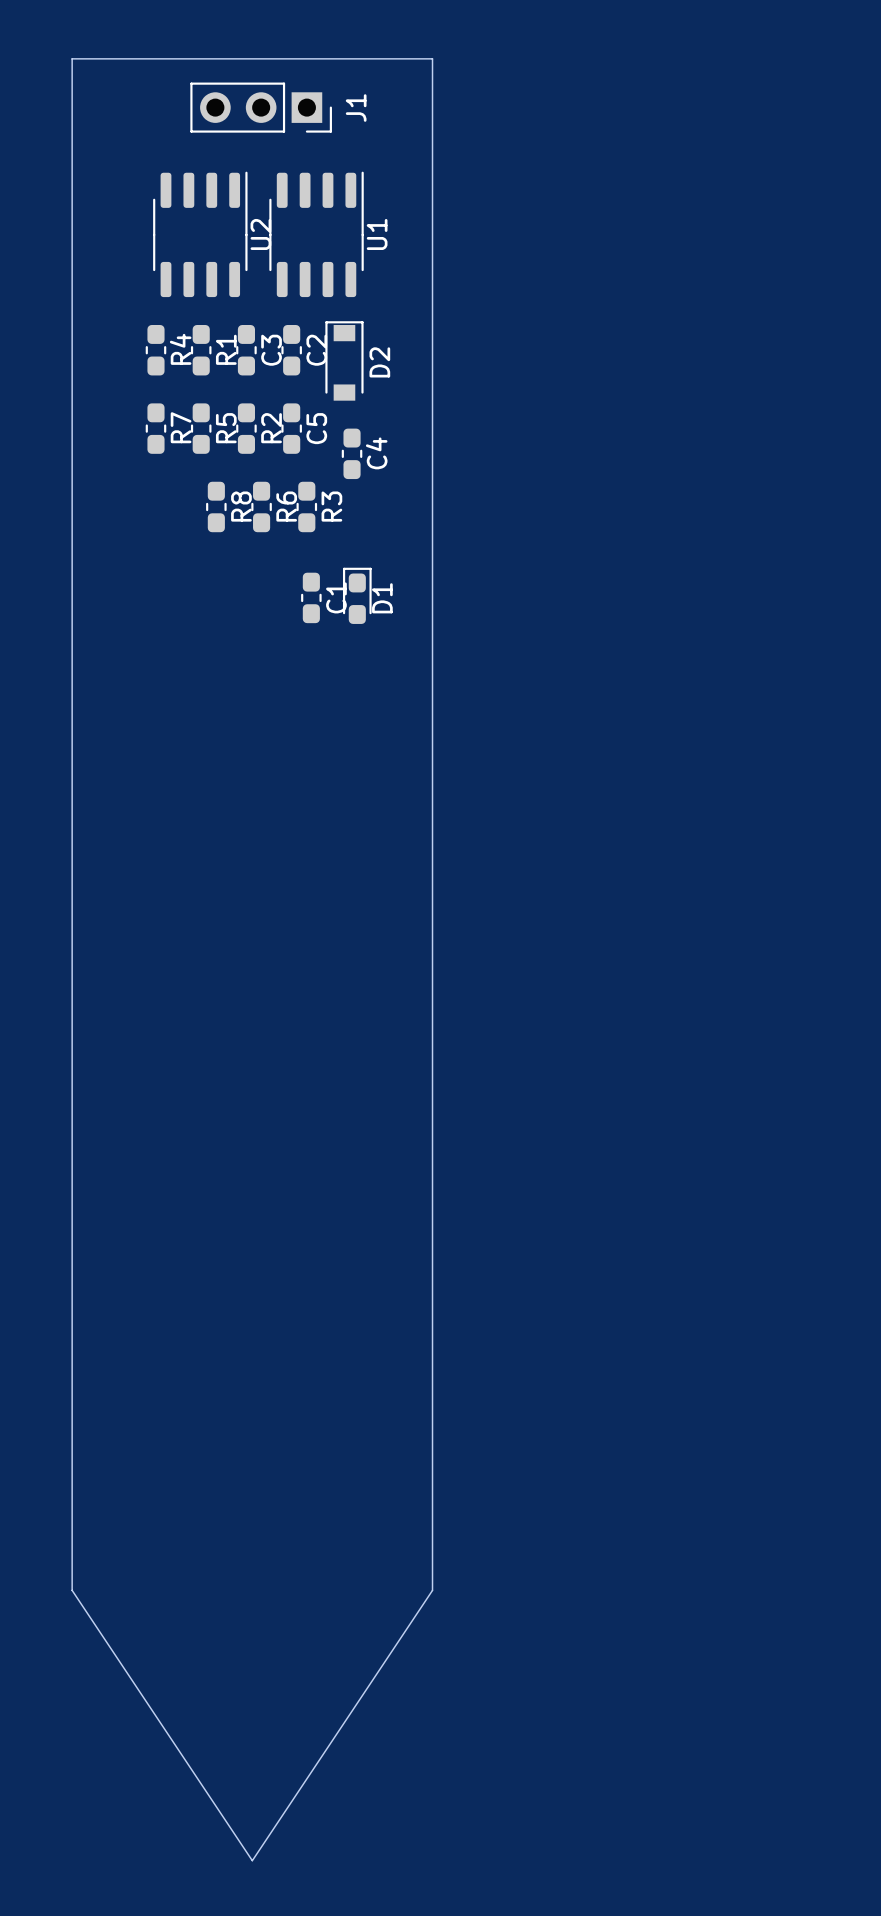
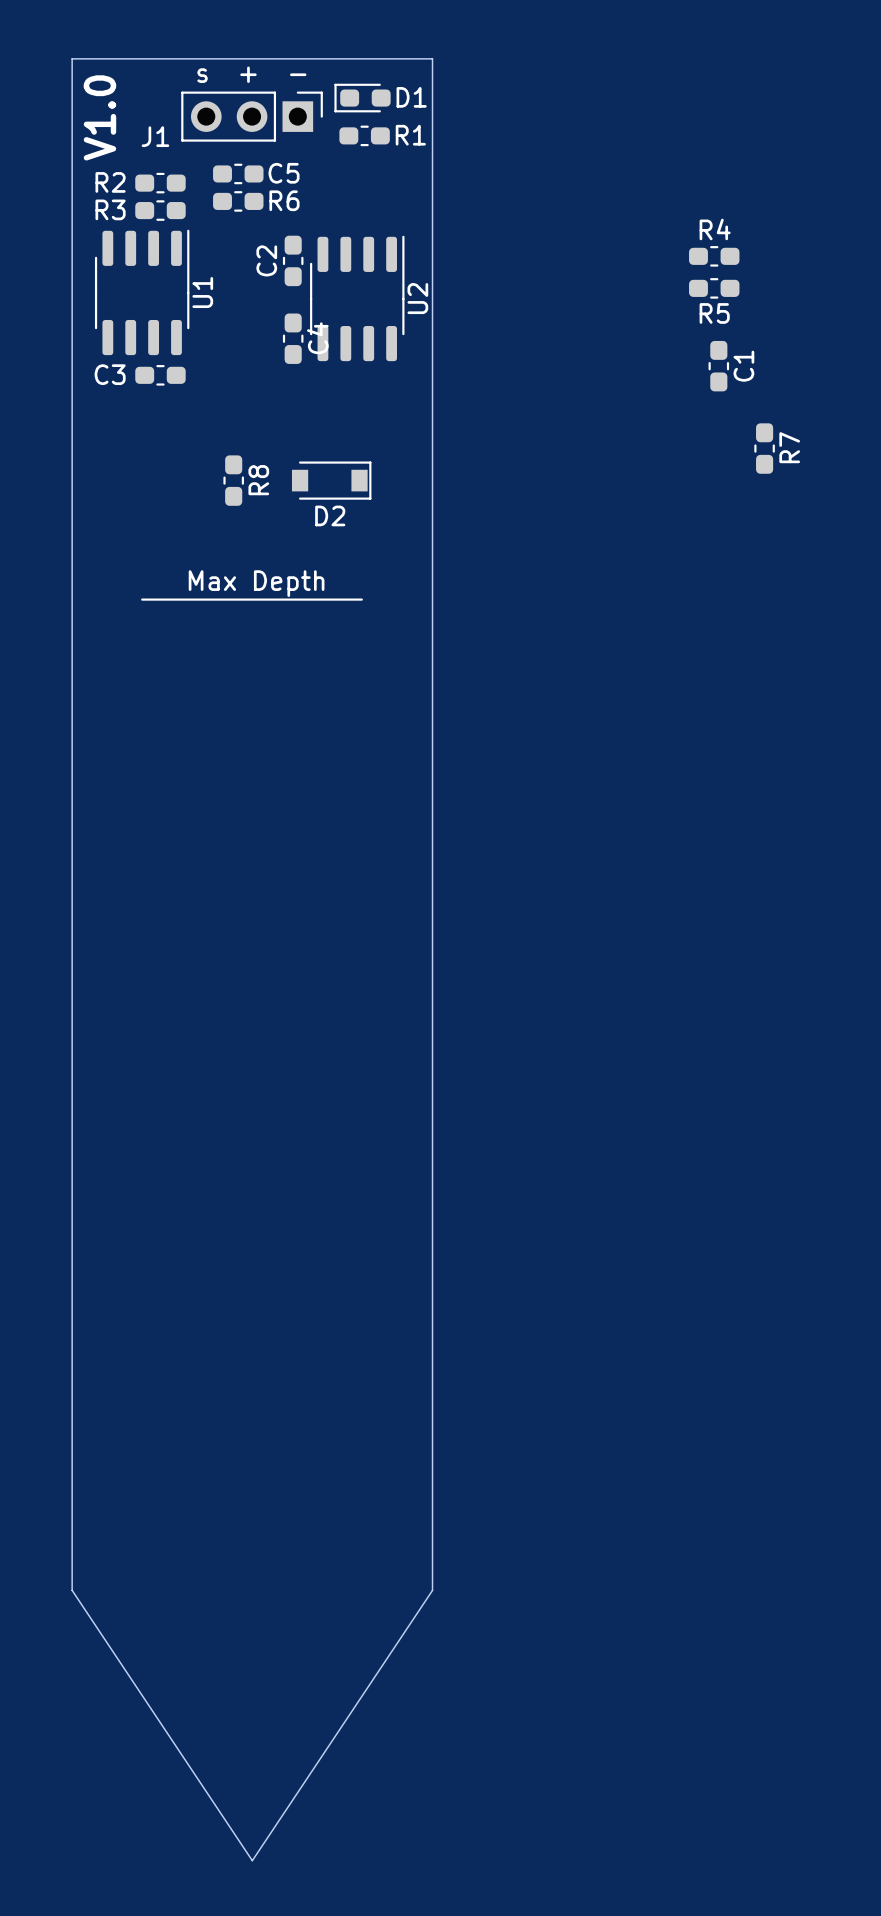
text: none -> s + - (251, 74)
J1 footprint: [190, 82, 332, 133] -> [181, 91, 323, 142]
J1 name position: J1 (356, 108) -> J1 (155, 136)
text: none -> V1.0 (99, 117)
U2 position: (200, 234) -> (357, 298)
U1 position: (316, 234) -> (142, 292)
R4 name position: R4 (180, 349) -> R4 (715, 229)
R4 rotation: 0° (155, 350) -> 90° clockwise (714, 256)
R4 position: (155, 350) -> (714, 256)
R1 rotation: 0° (201, 350) -> 90° clockwise (364, 135)
R1 position: (201, 350) -> (364, 135)
C3 rotation: 0° (246, 350) -> 90° clockwise (160, 375)
C3 position: (246, 350) -> (160, 375)
C3 name position: C3 (271, 350) -> C3 (110, 374)
C2 position: (291, 350) -> (293, 260)
C2 name position: C2 (316, 350) -> C2 (266, 260)
D2 rotation: 0° (344, 360) -> 90° clockwise (331, 480)
D2 position: (344, 360) -> (331, 480)
R7 position: (155, 428) -> (764, 448)
R5 rotation: 0° (201, 428) -> 90° clockwise (714, 288)
R5 position: (201, 428) -> (714, 288)
R2 rotation: 0° (246, 428) -> 90° clockwise (160, 183)
R2 position: (246, 428) -> (160, 183)
R2 name position: R2 (271, 428) -> R2 (110, 182)
C5 rotation: 0° (291, 428) -> 90° clockwise (238, 173)
C5 position: (291, 428) -> (238, 173)
C4 position: (352, 453) -> (293, 338)
R8 position: (216, 506) -> (233, 480)
R6 rotation: 0° (261, 506) -> 90° clockwise (238, 201)
R6 position: (261, 506) -> (238, 201)
R3 rotation: 0° (306, 506) -> 90° clockwise (160, 210)
R3 position: (306, 506) -> (160, 210)
R3 name position: R3 (331, 506) -> R3 (110, 209)
text: none -> Max Depth (256, 583)
D1 rotation: 0° (357, 595) -> 90° counterclockwise (362, 98)
D1 position: (357, 595) -> (362, 98)
C1 position: (311, 597) -> (718, 366)
line: none -> (142, 599) (361, 599)

